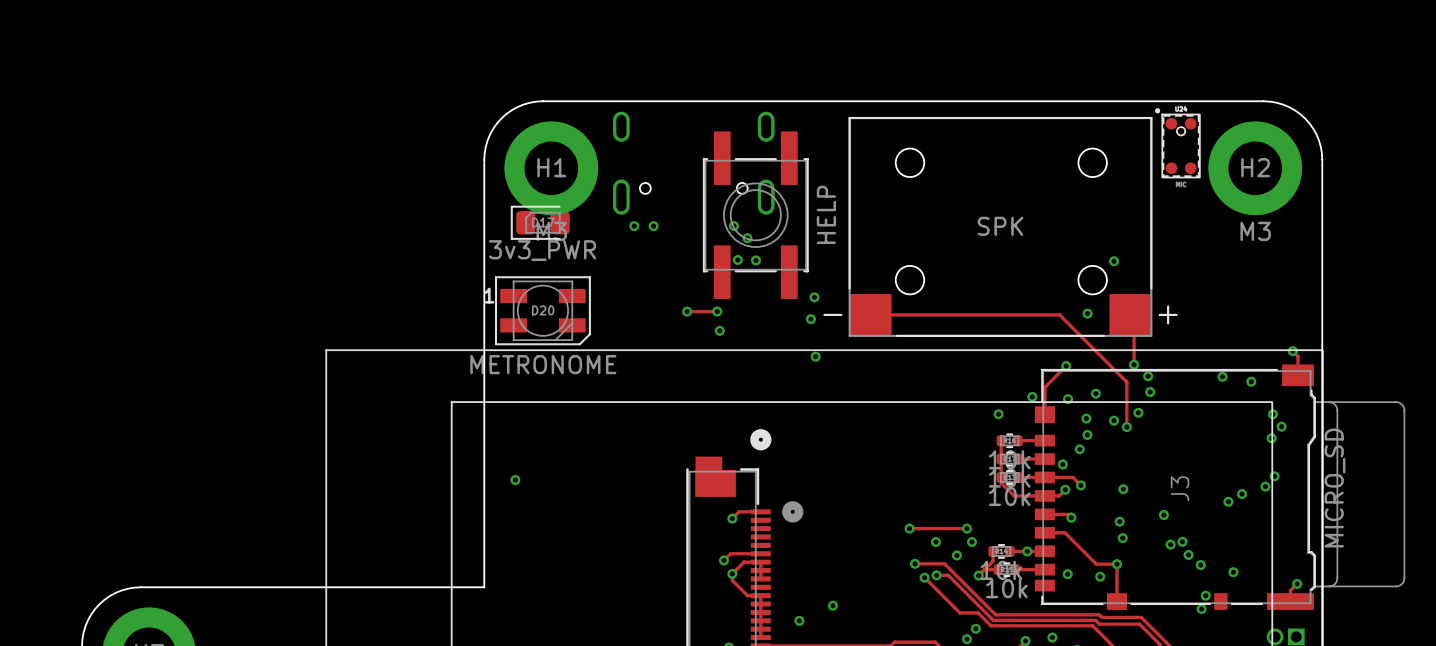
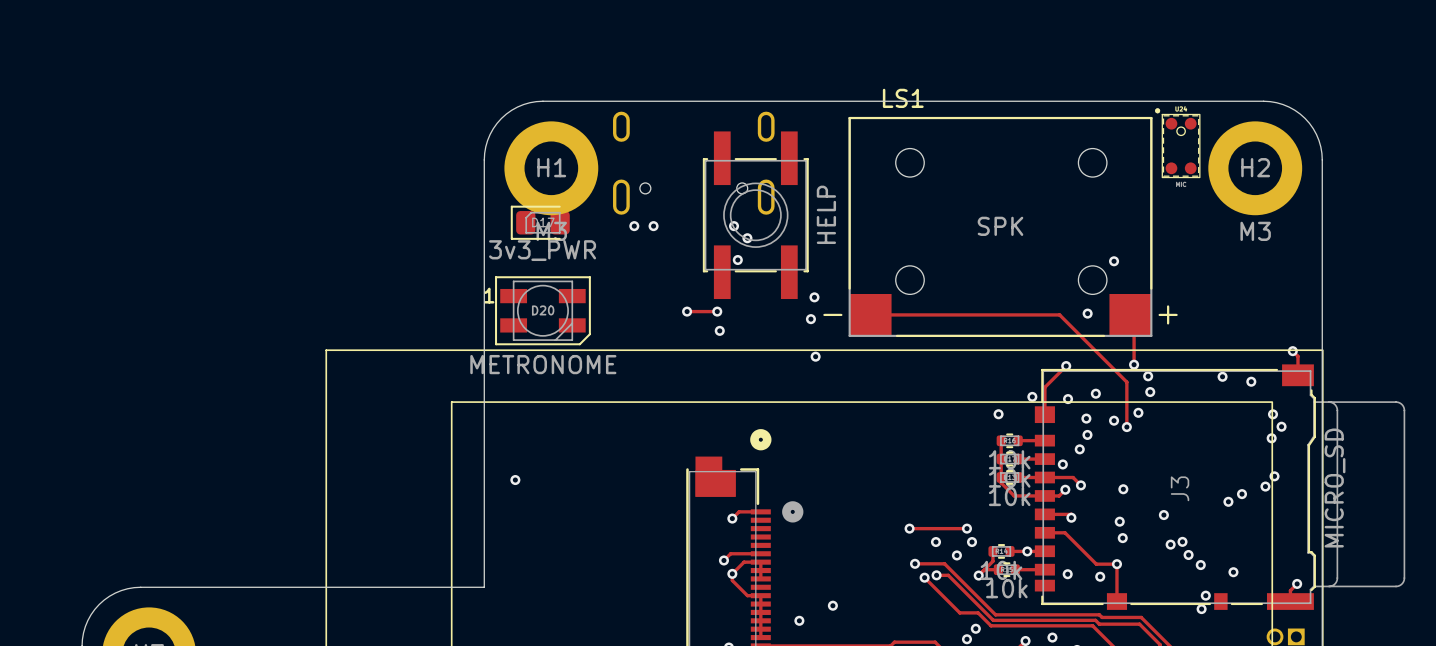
LS1 name: none -> LS1 (903, 98)
via: (755, 260) -> none

